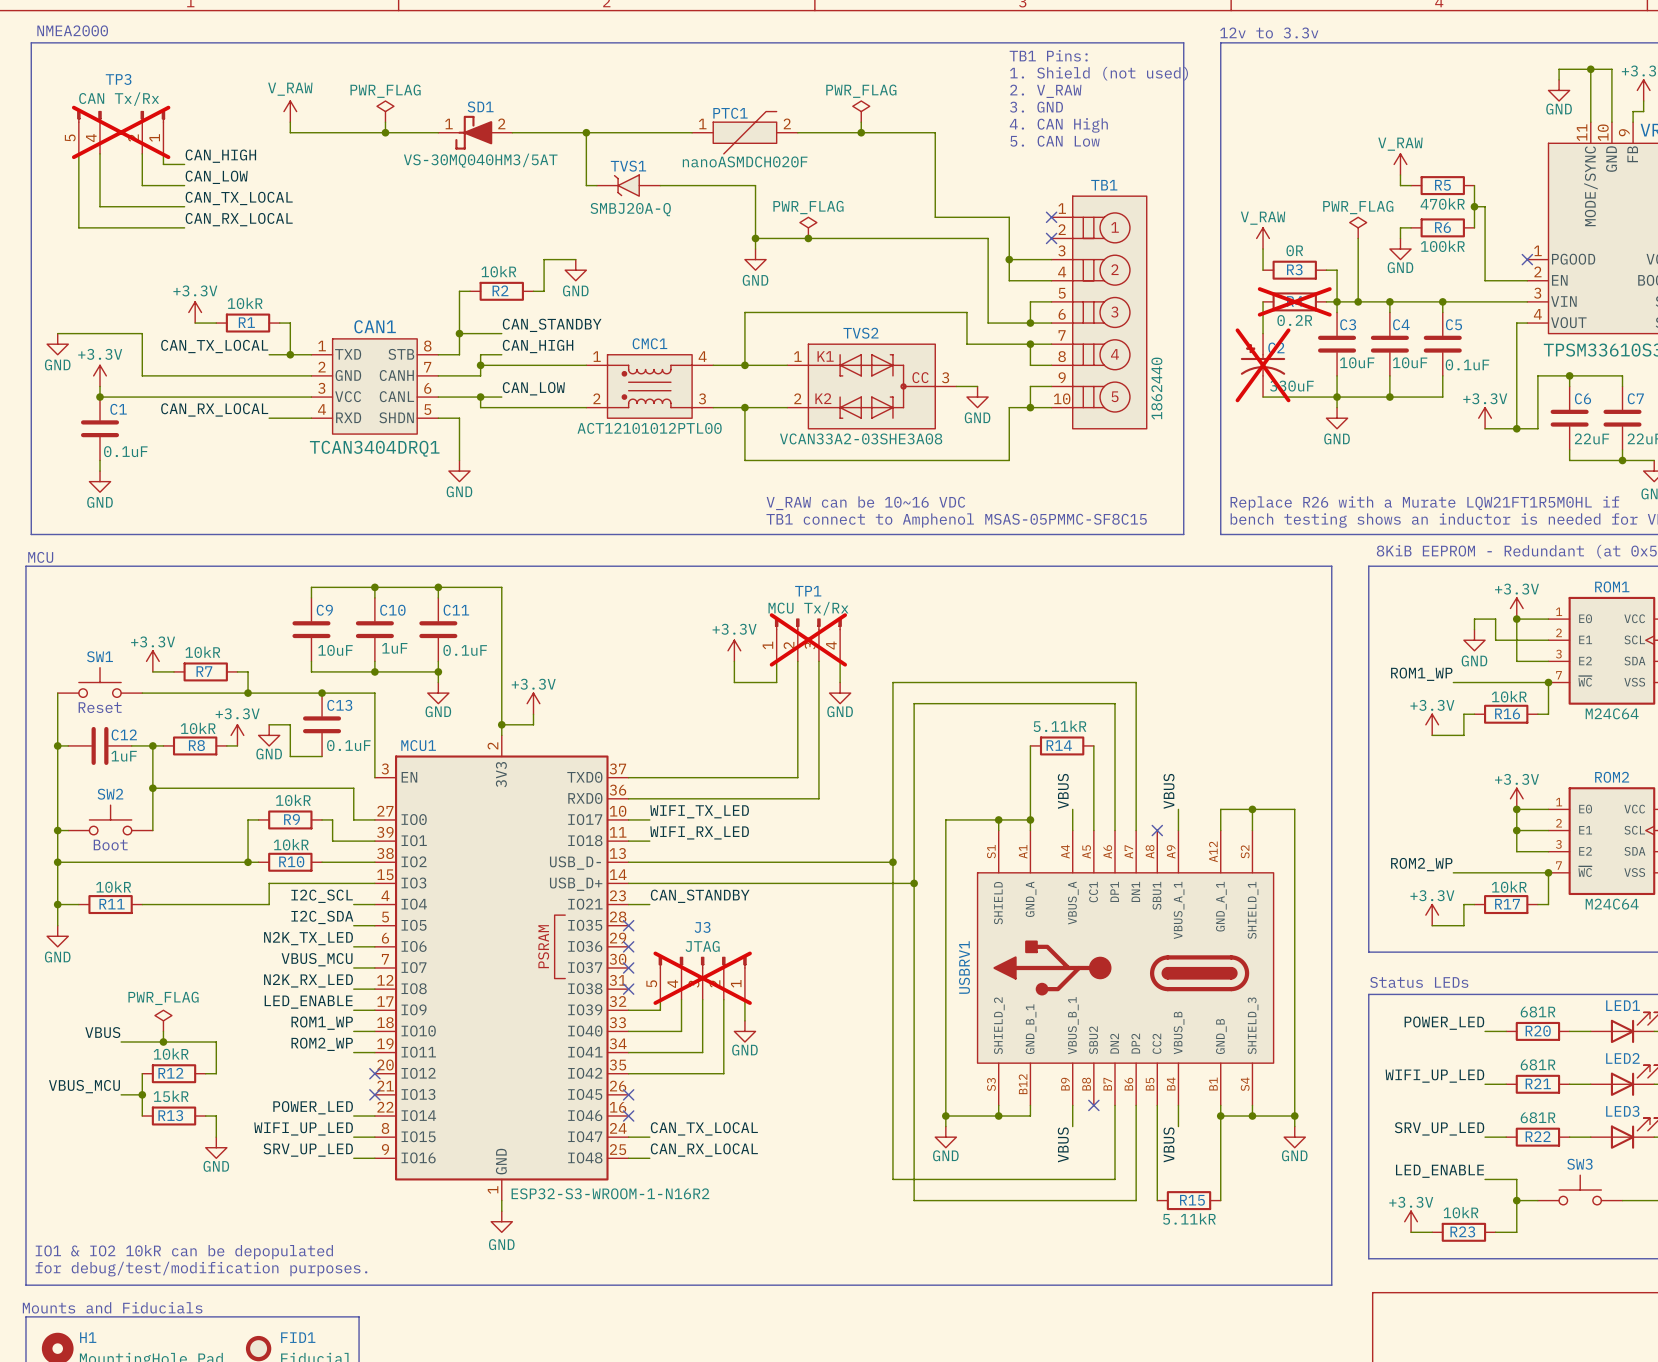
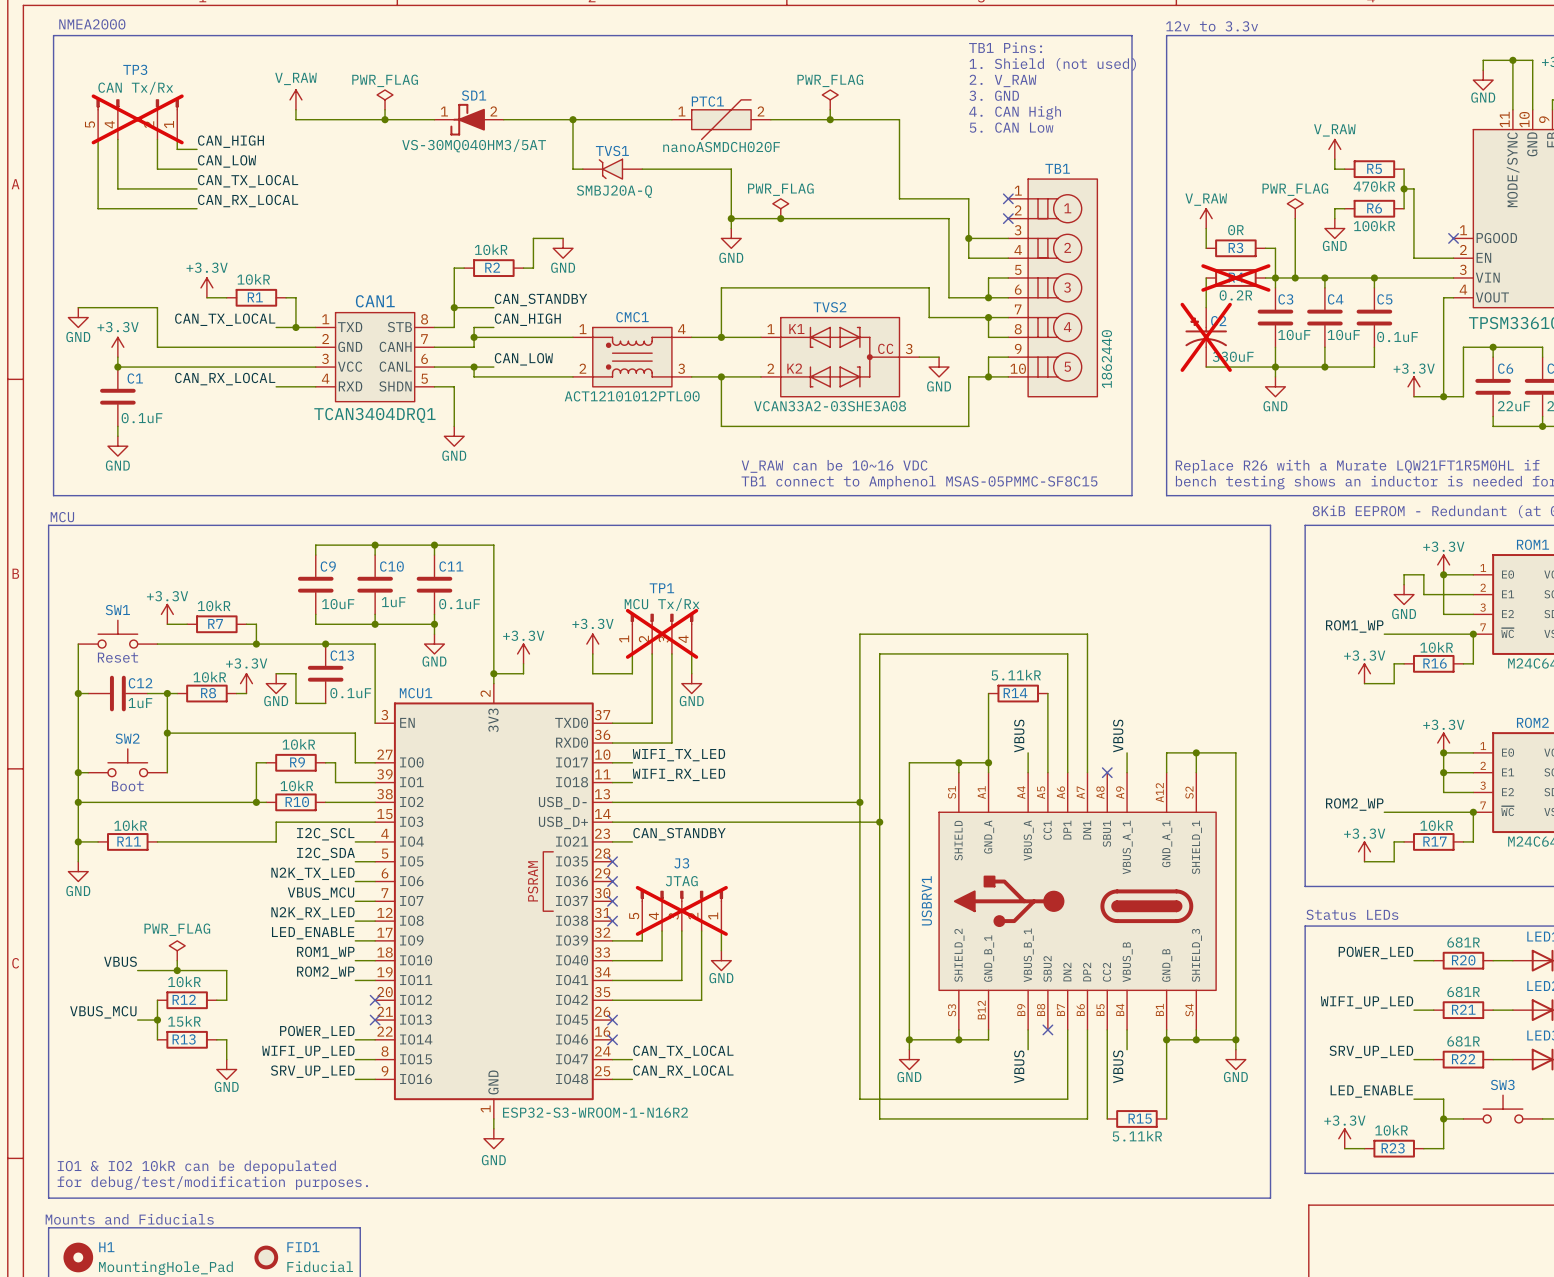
TP1 position: (808, 639) -> (662, 633)
power symbol position: +3.3V (734, 650) -> +3.3V (592, 644)
wire: (734, 661) (734, 682) (776, 682) (776, 661) -> (592, 653) (592, 673) (632, 673) (632, 653)
wire: (797, 661) (797, 777) (670, 777) -> (652, 653) (652, 723)
wire: (818, 661) (818, 798) (692, 798) -> (671, 653) (671, 743)
wire: (840, 661) (840, 682) -> (691, 653) (691, 673)
power symbol position: GND (840, 693) -> GND (691, 683)

